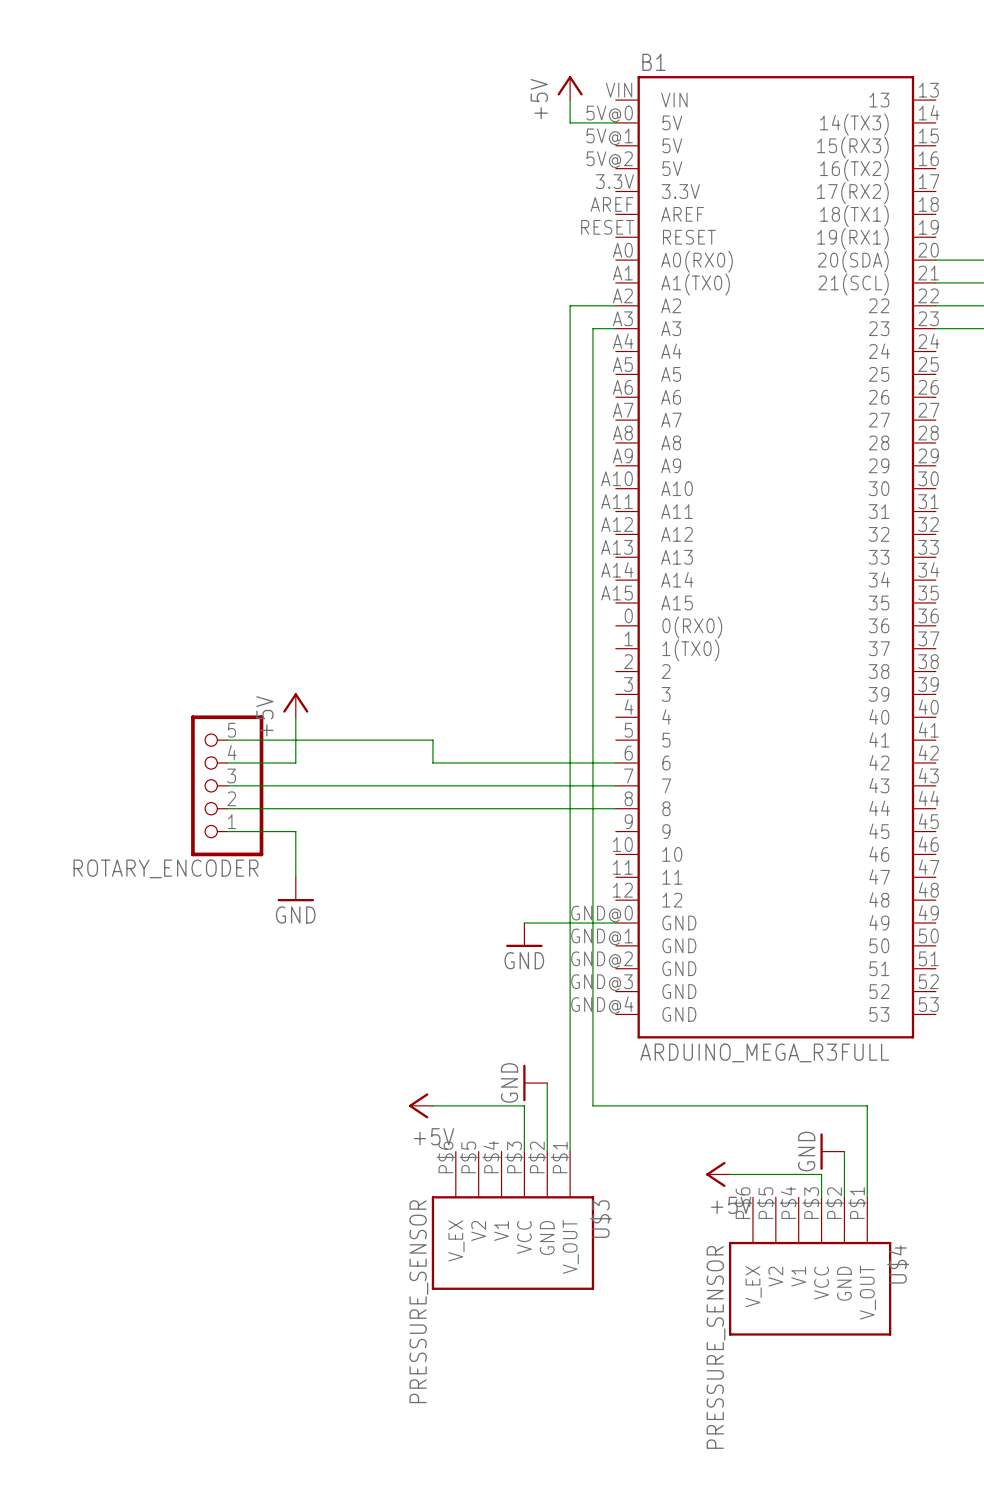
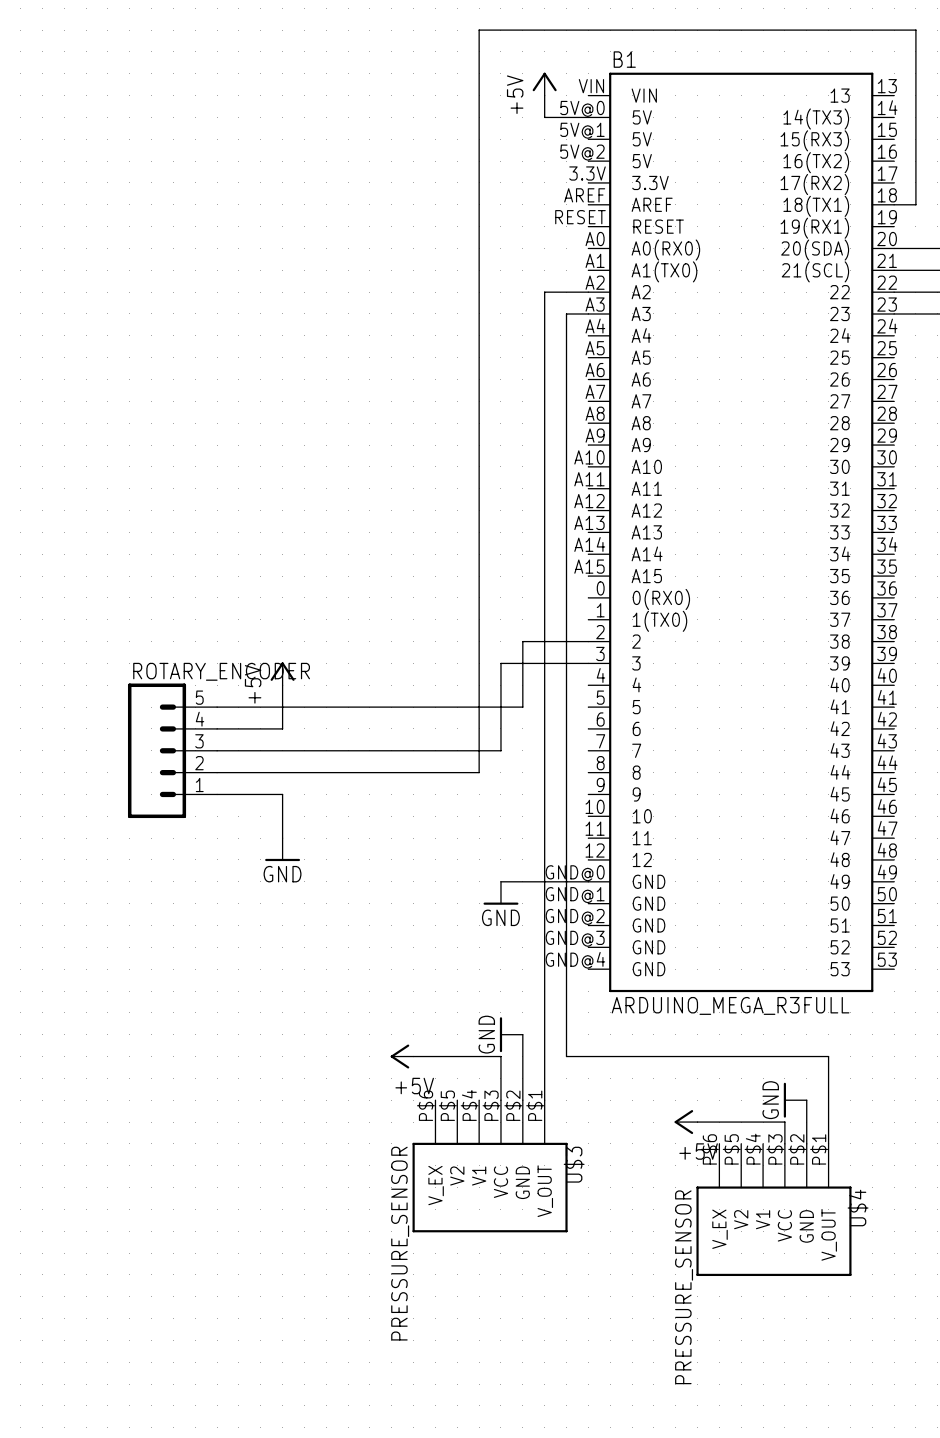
wire: (432, 740) (432, 762) (615, 762) -> (413, 707) (522, 707) (522, 641) (588, 641)
ROTARY_ENCODER: none -> (172, 750)
ROTARY_ENCODER: (227, 785) -> none
wire: (524, 785) (615, 785) -> (500, 750) (500, 663) (588, 663)
wire: (501, 808) (615, 808) -> (479, 772) (479, 30) (915, 30) (915, 204) (894, 204)

